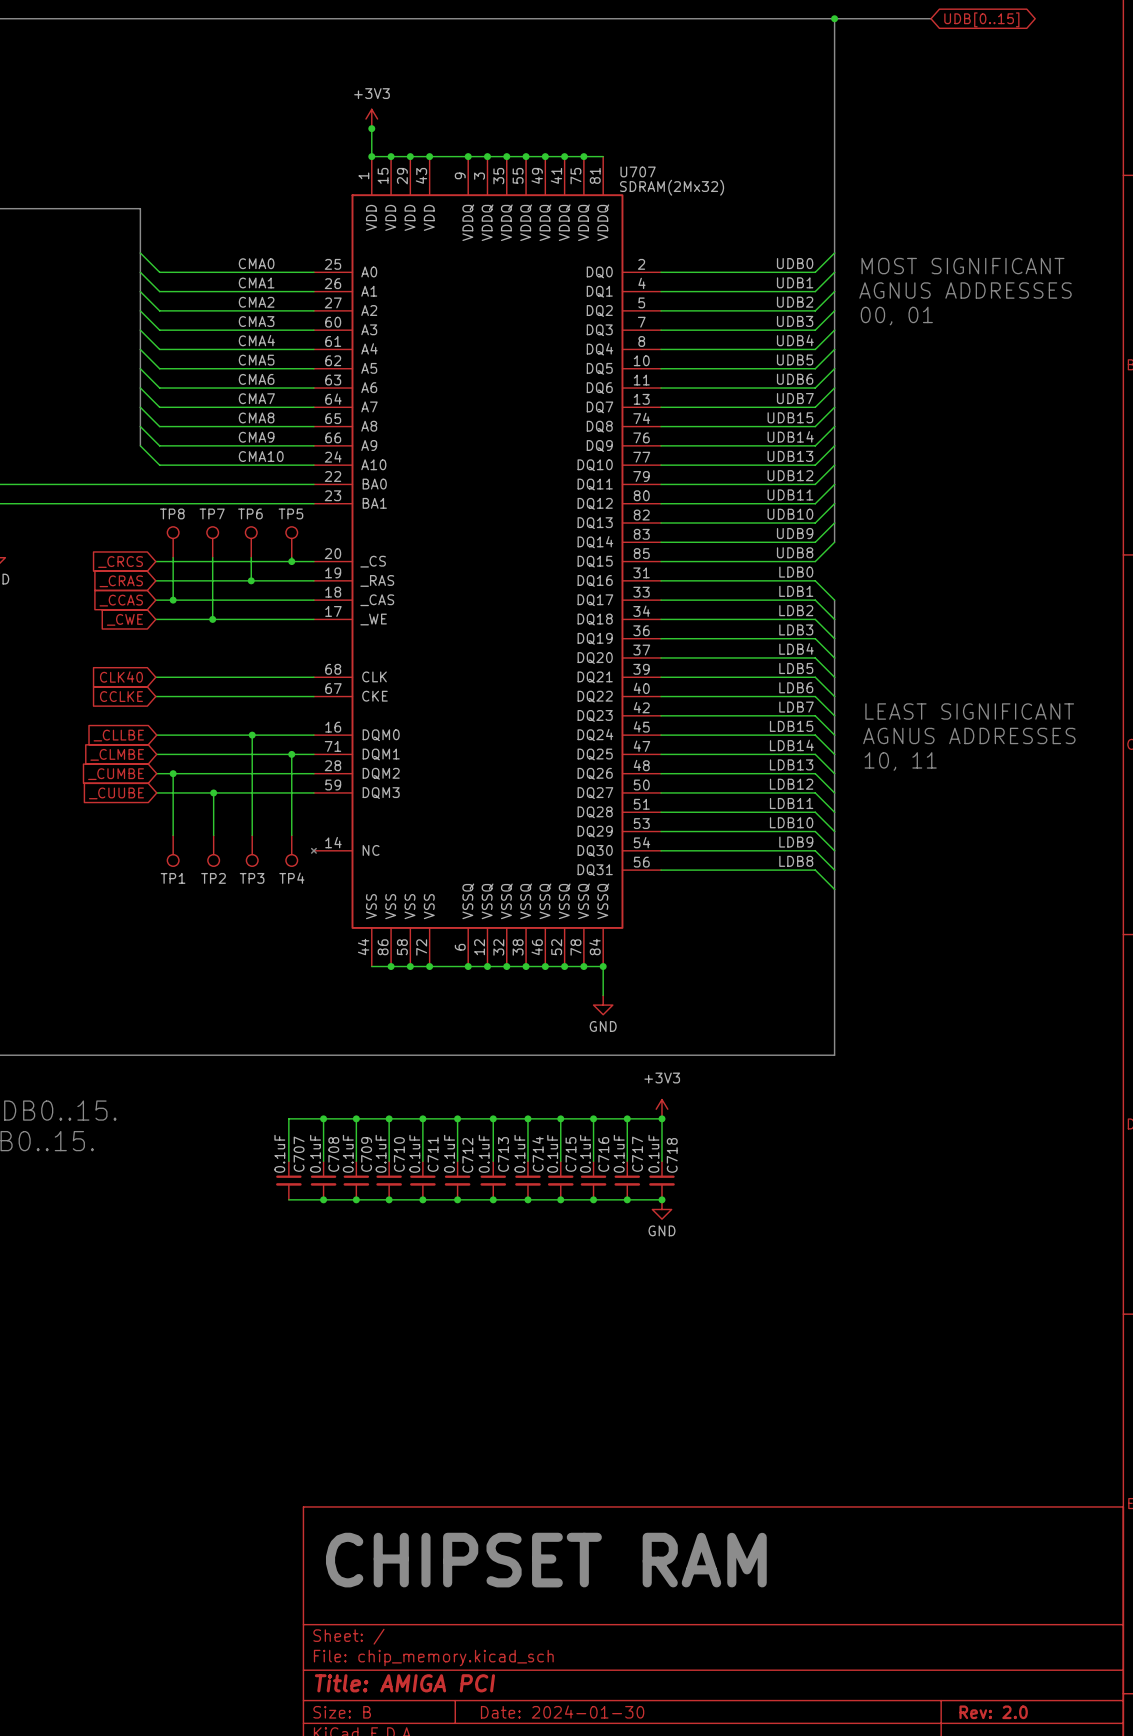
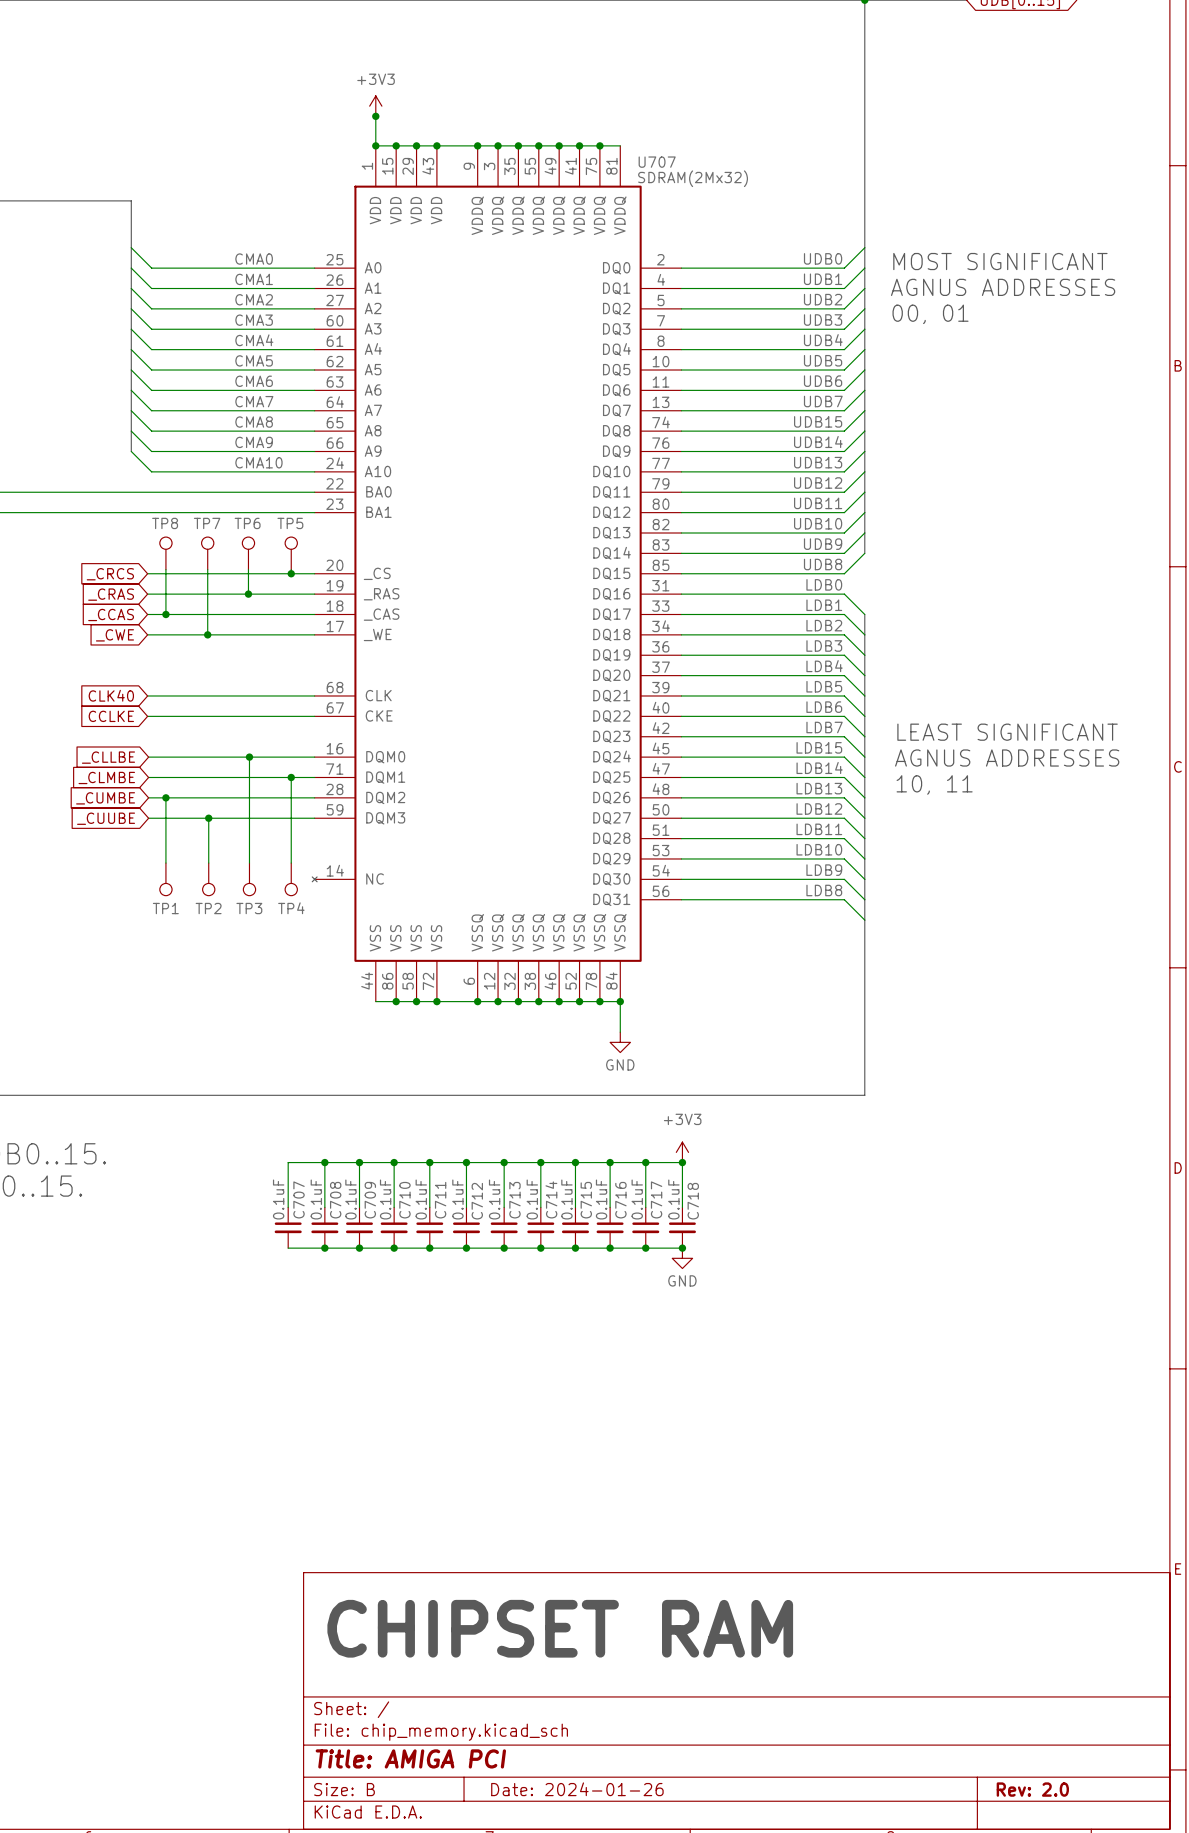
title block: Date: 2024-01-30 (562, 1712) -> Date: 2024-01-26 (577, 1789)

